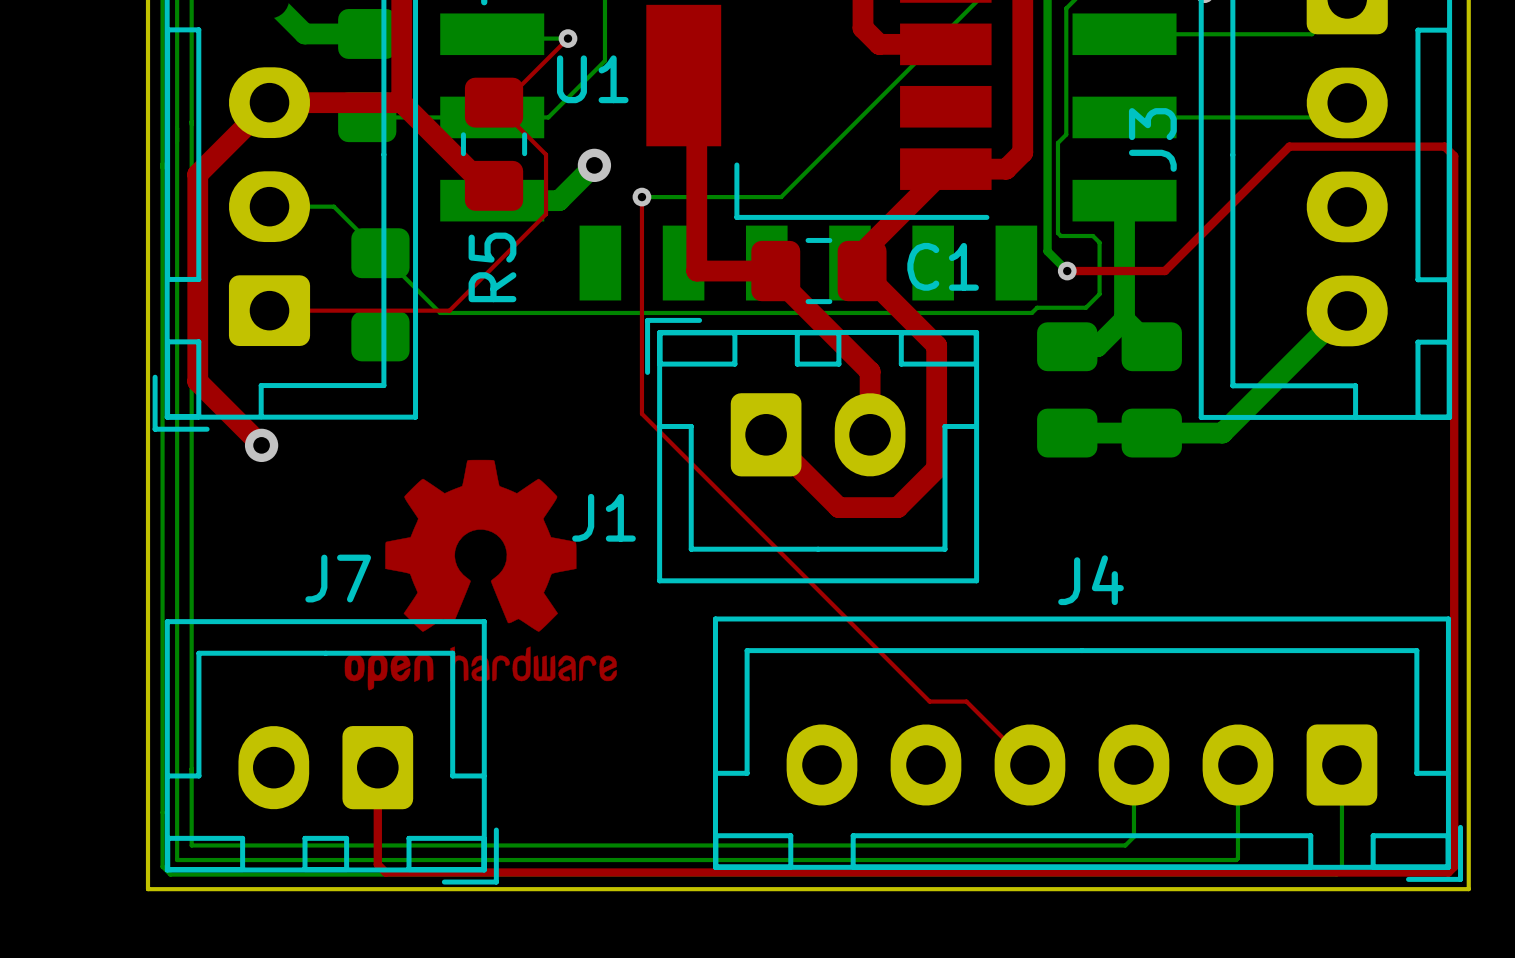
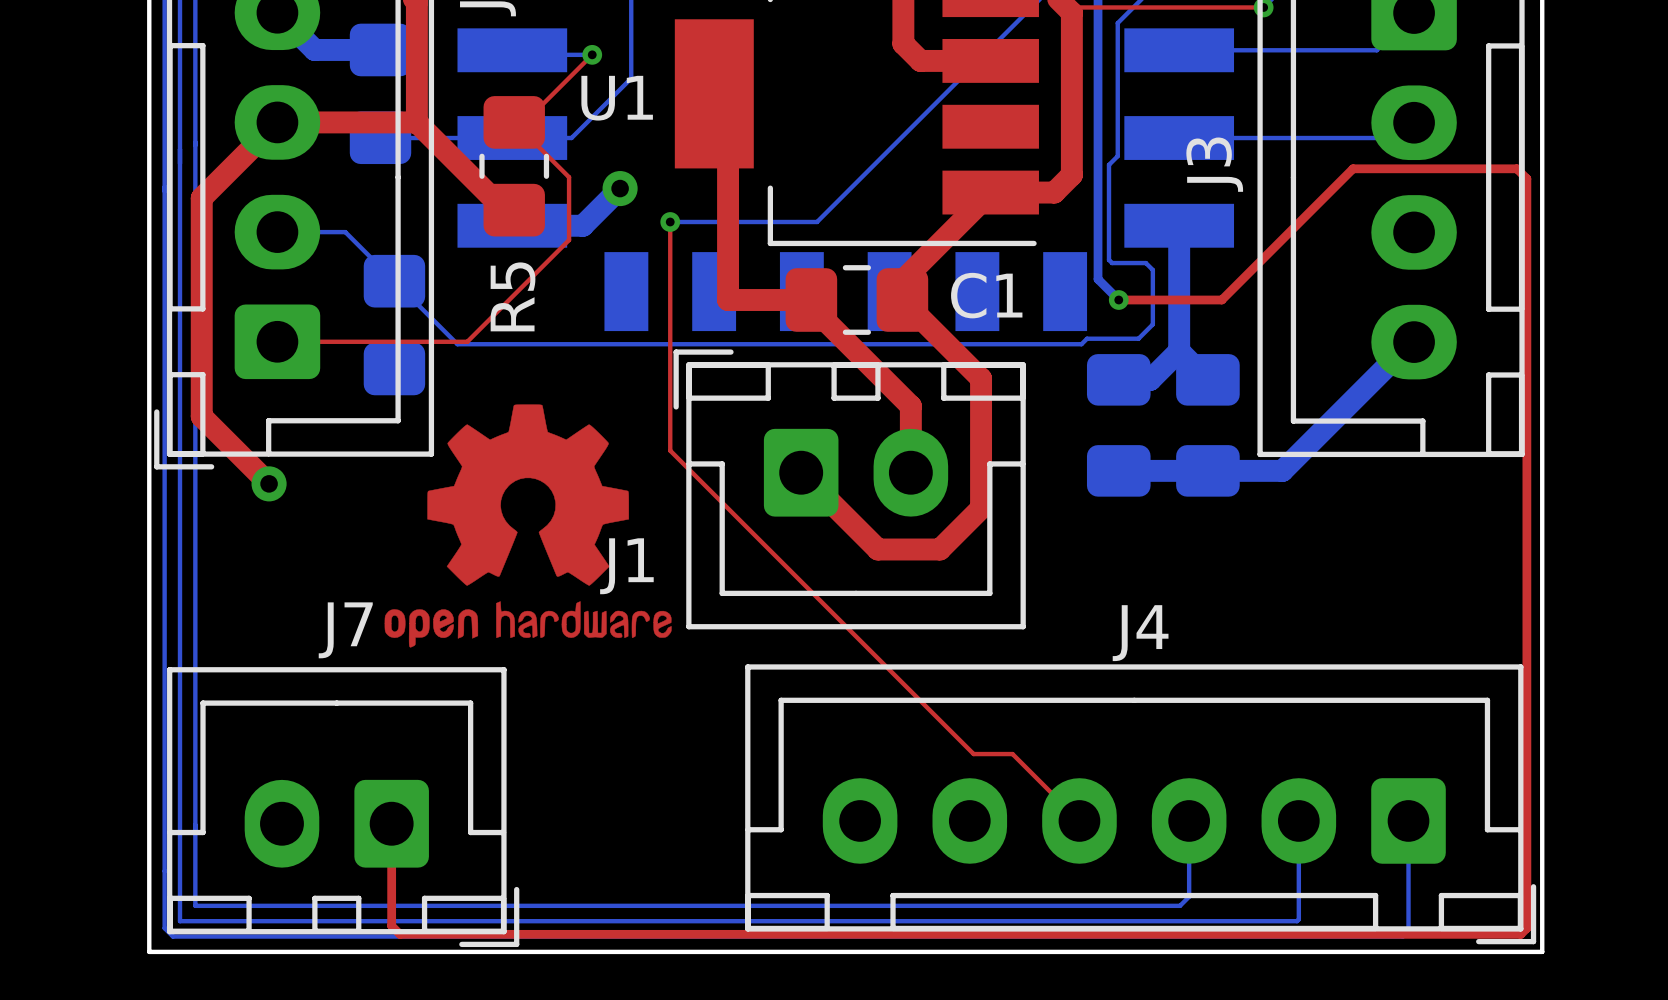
drawing position: (480, 575) -> (528, 525)

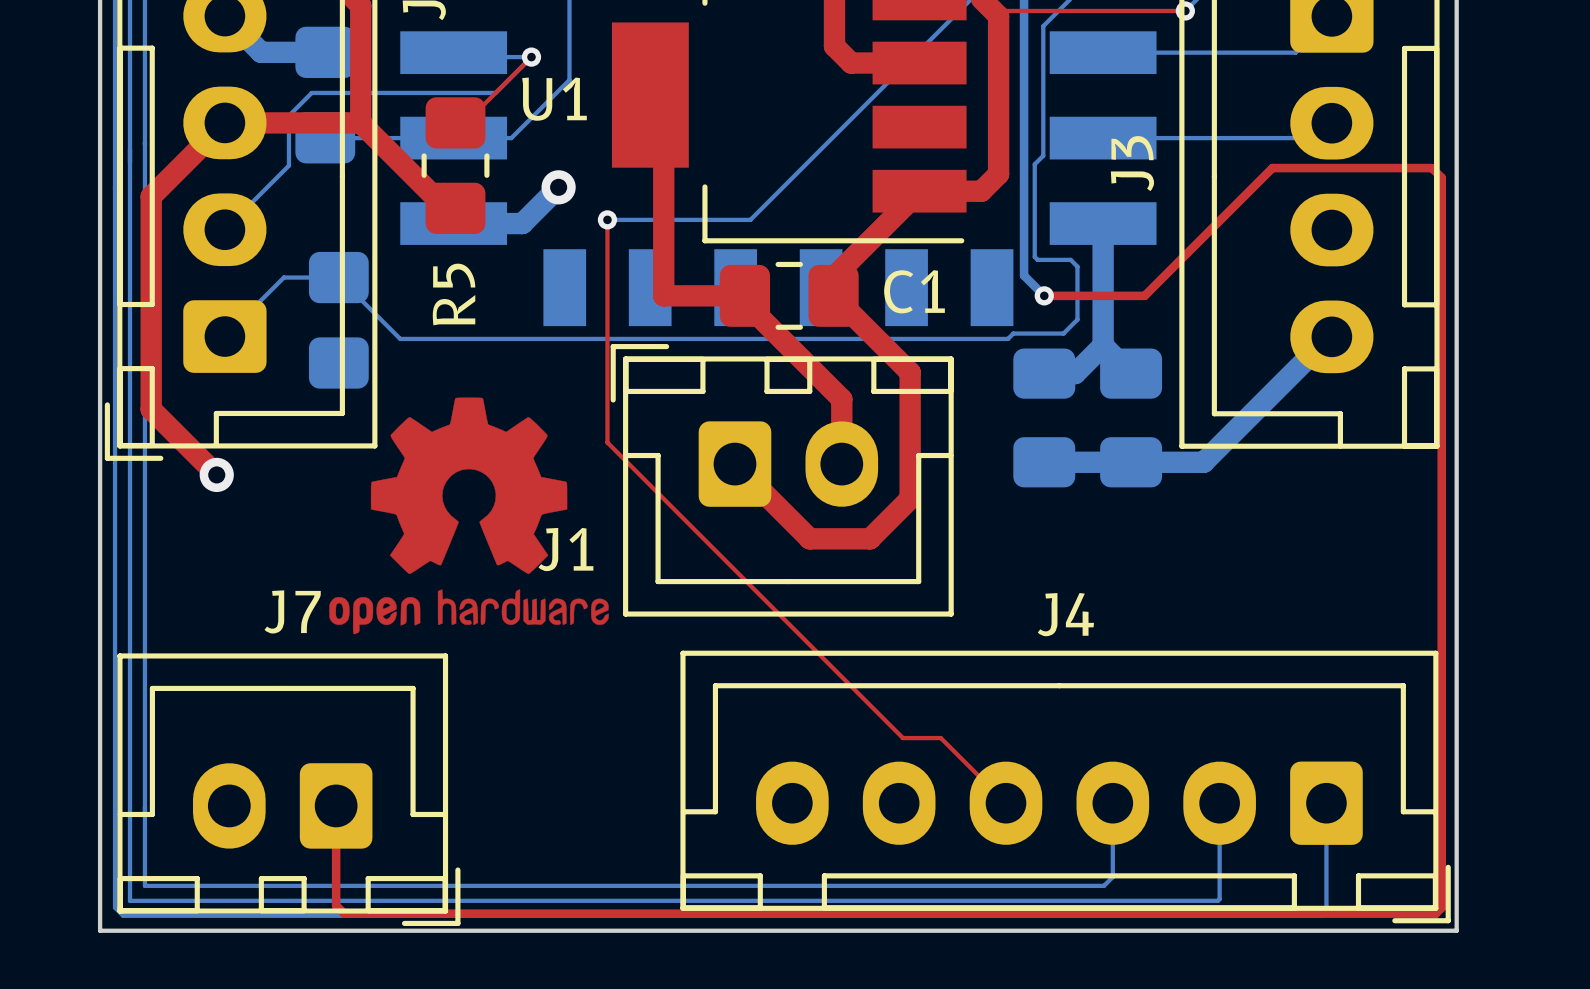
bottom track: none -> (531, 57) (495, 92) (311, 92) (288, 115) (288, 165) (224, 229)
top track: (514, 122) (569, 177) (569, 240) (467, 341) (277, 341) -> none
bottom track: (277, 232) (345, 232) (394, 281) -> (224, 336) (283, 277) (338, 277)

